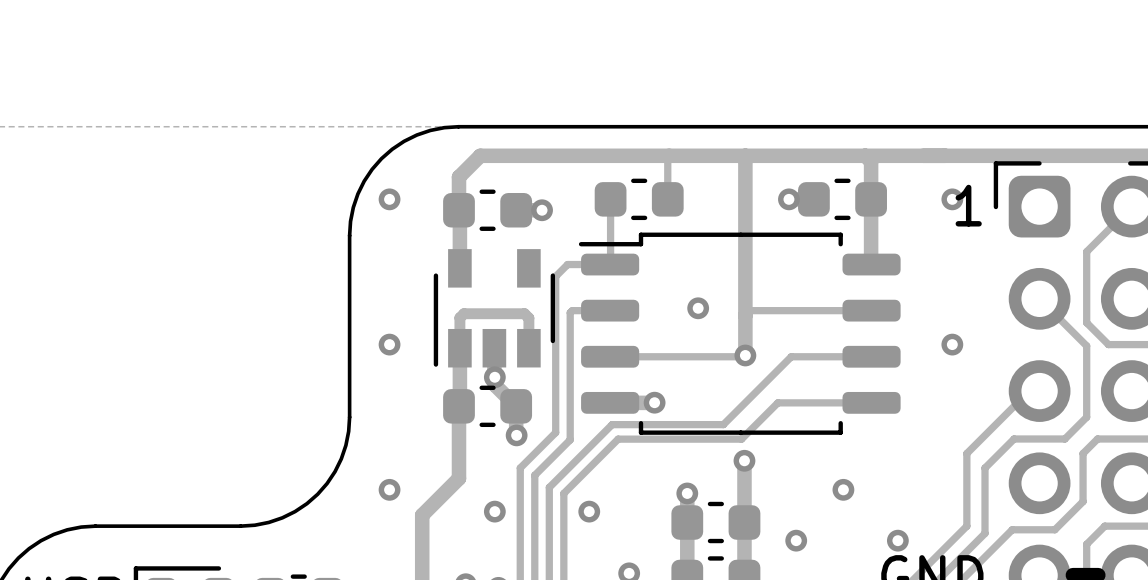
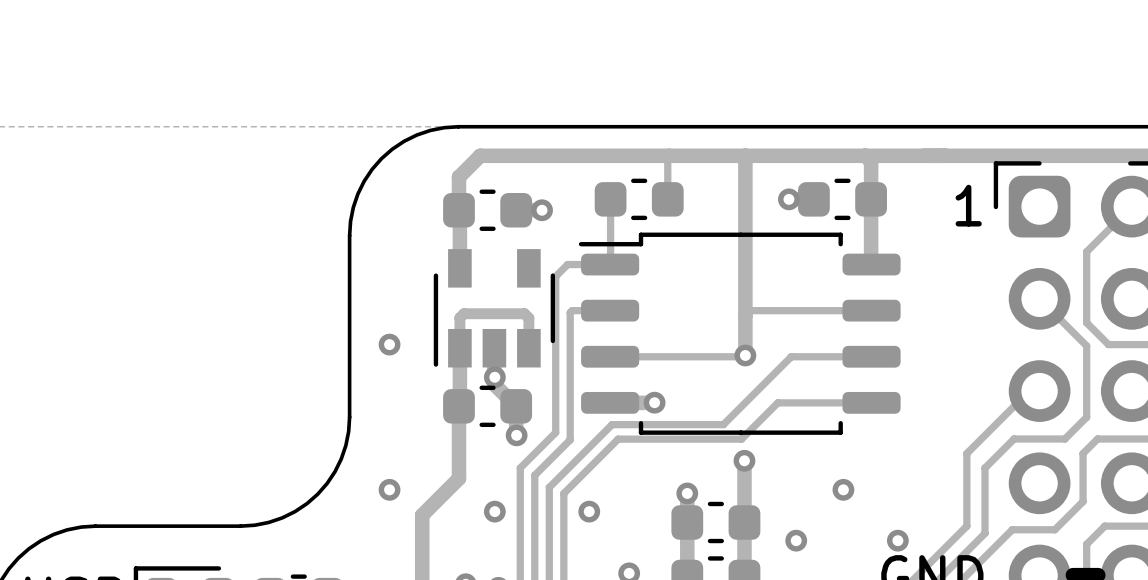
via: (389, 199) -> none
via: (952, 199) -> none
via: (698, 308) -> none
via: (952, 344) -> none

